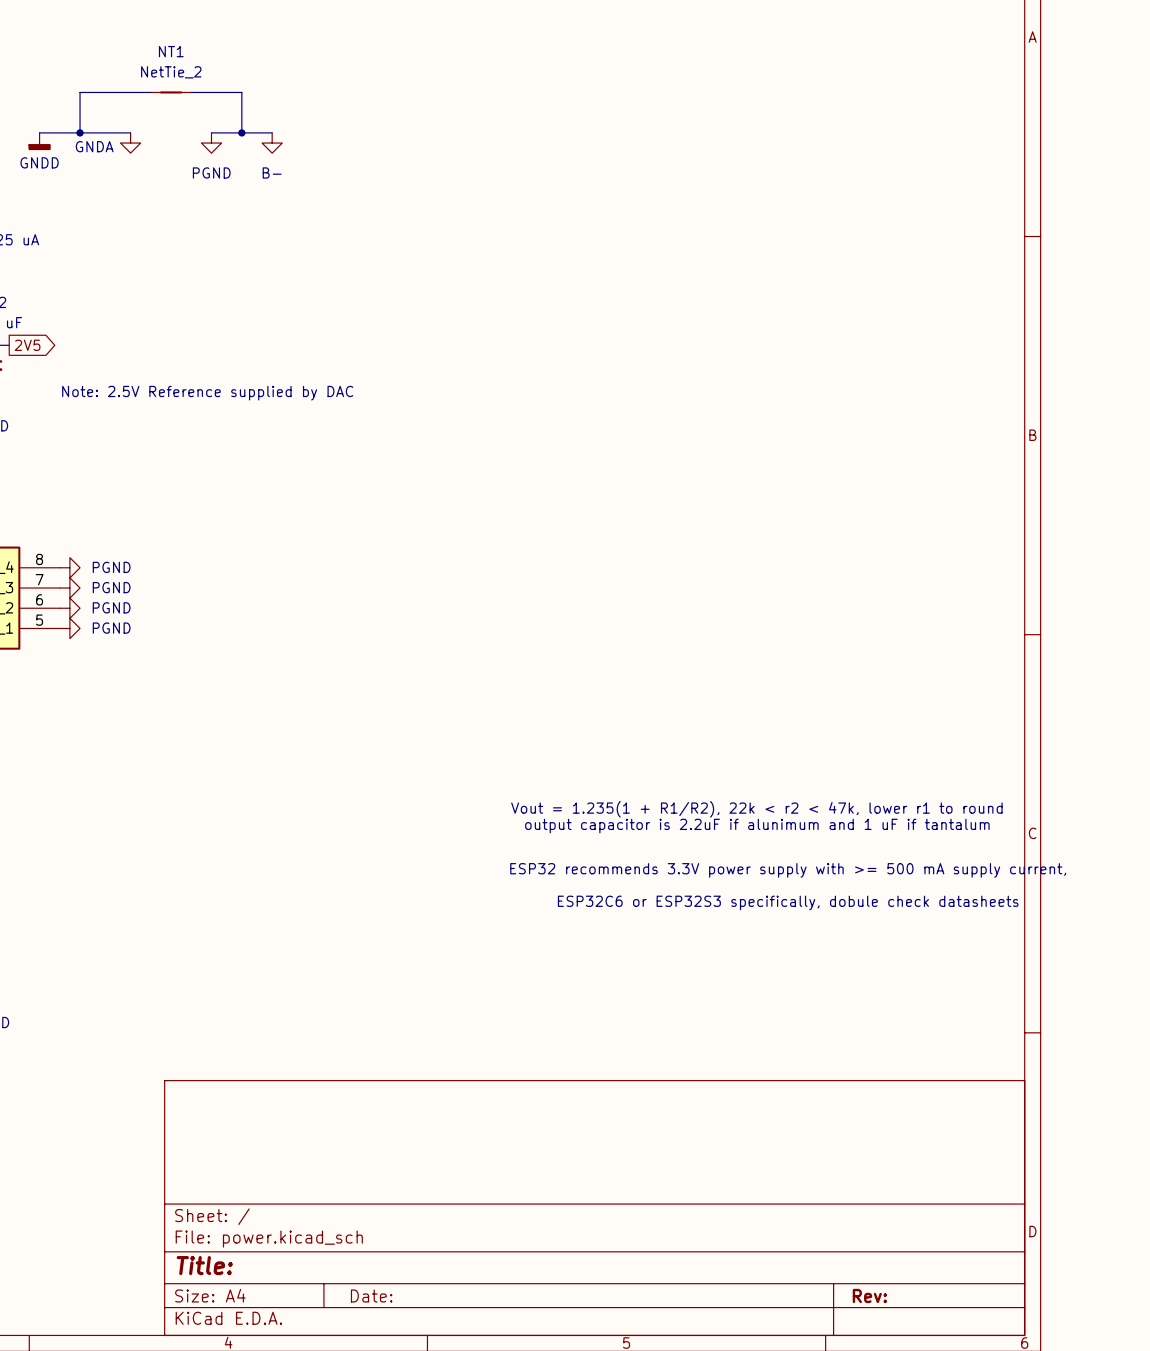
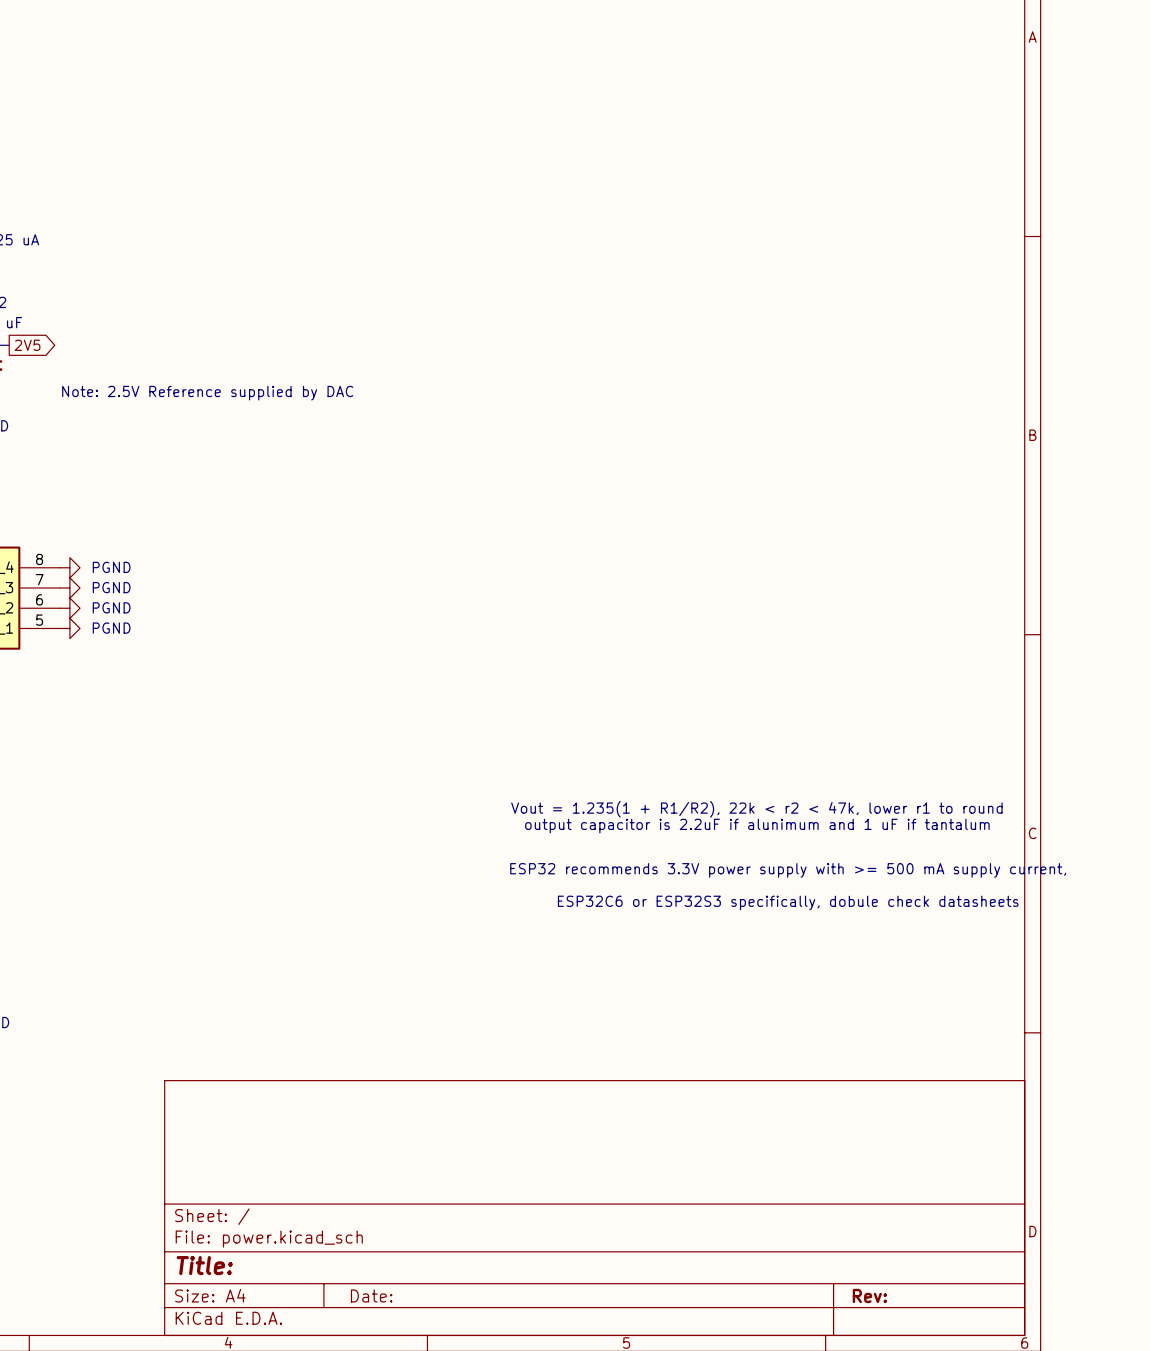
wire: (150, 92) (80, 92) (80, 132) -> none
NT1: NetTie_2 (171, 92) -> none
wire: (191, 92) (241, 92) (241, 132) -> none
wire: (39, 132) (130, 132) -> none
junction: (80, 132) -> none
wire: (211, 132) (272, 132) -> none
junction: (241, 132) -> none
power symbol: GNDD (39, 141) -> none
power symbol: GNDA (130, 143) -> none
power symbol: PGND (211, 143) -> none
power symbol: B- (272, 143) -> none

